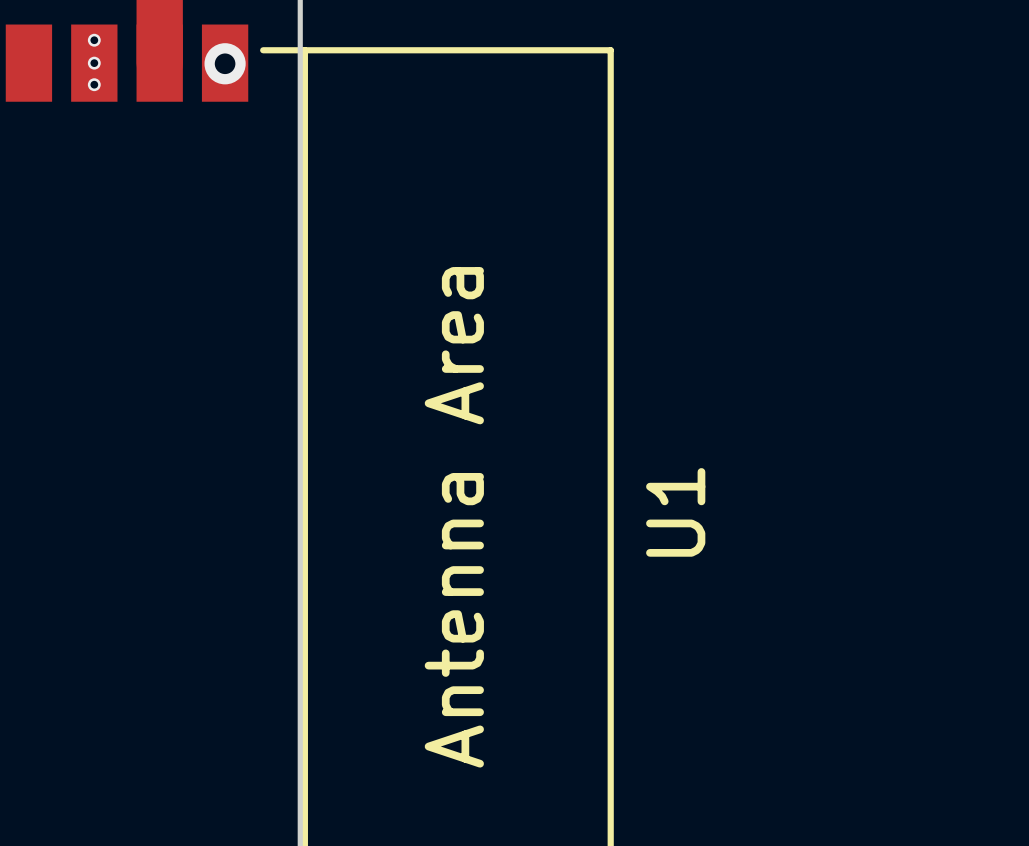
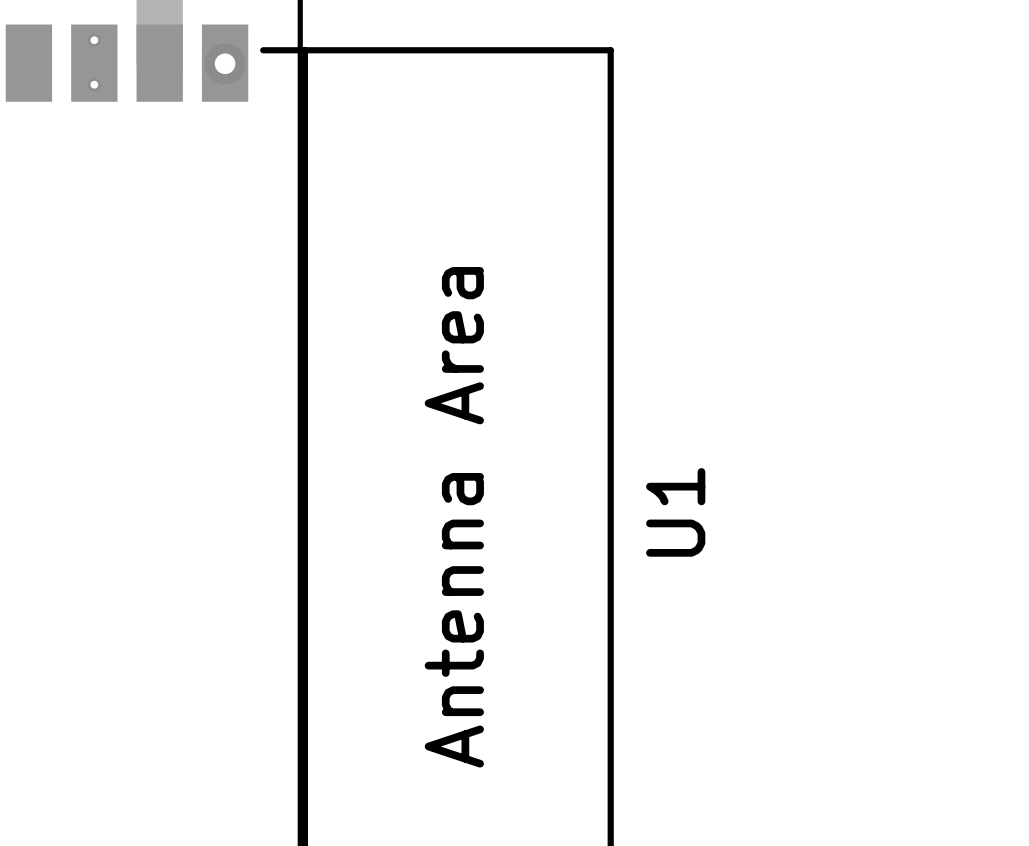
via: (94, 63) -> none

